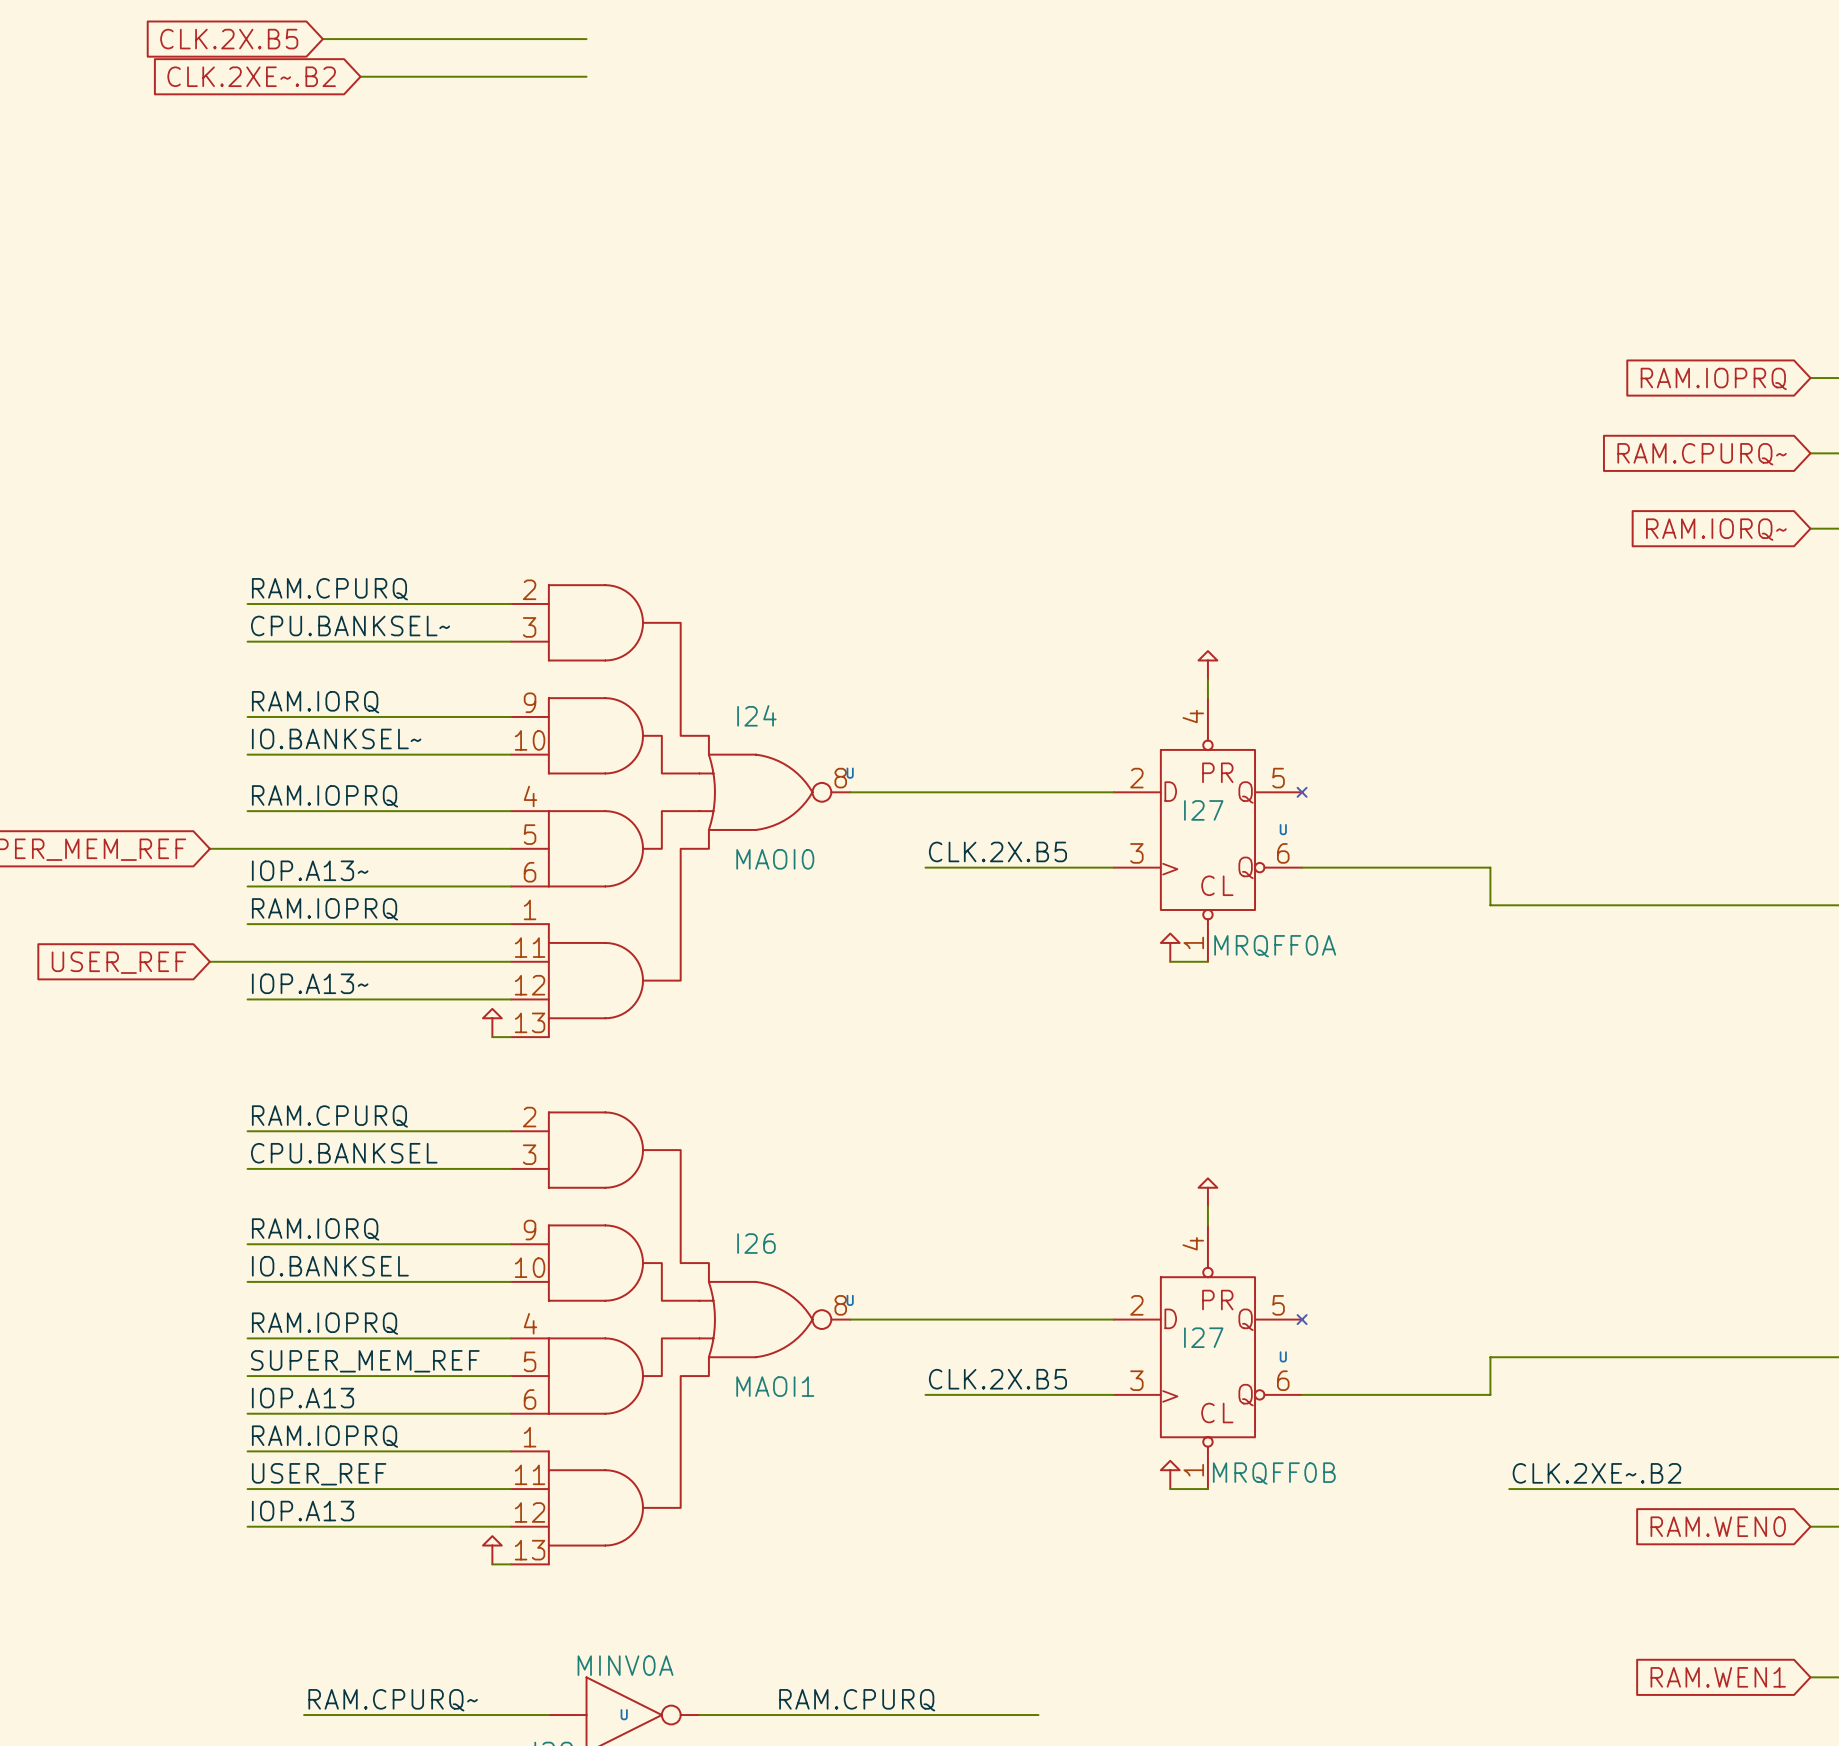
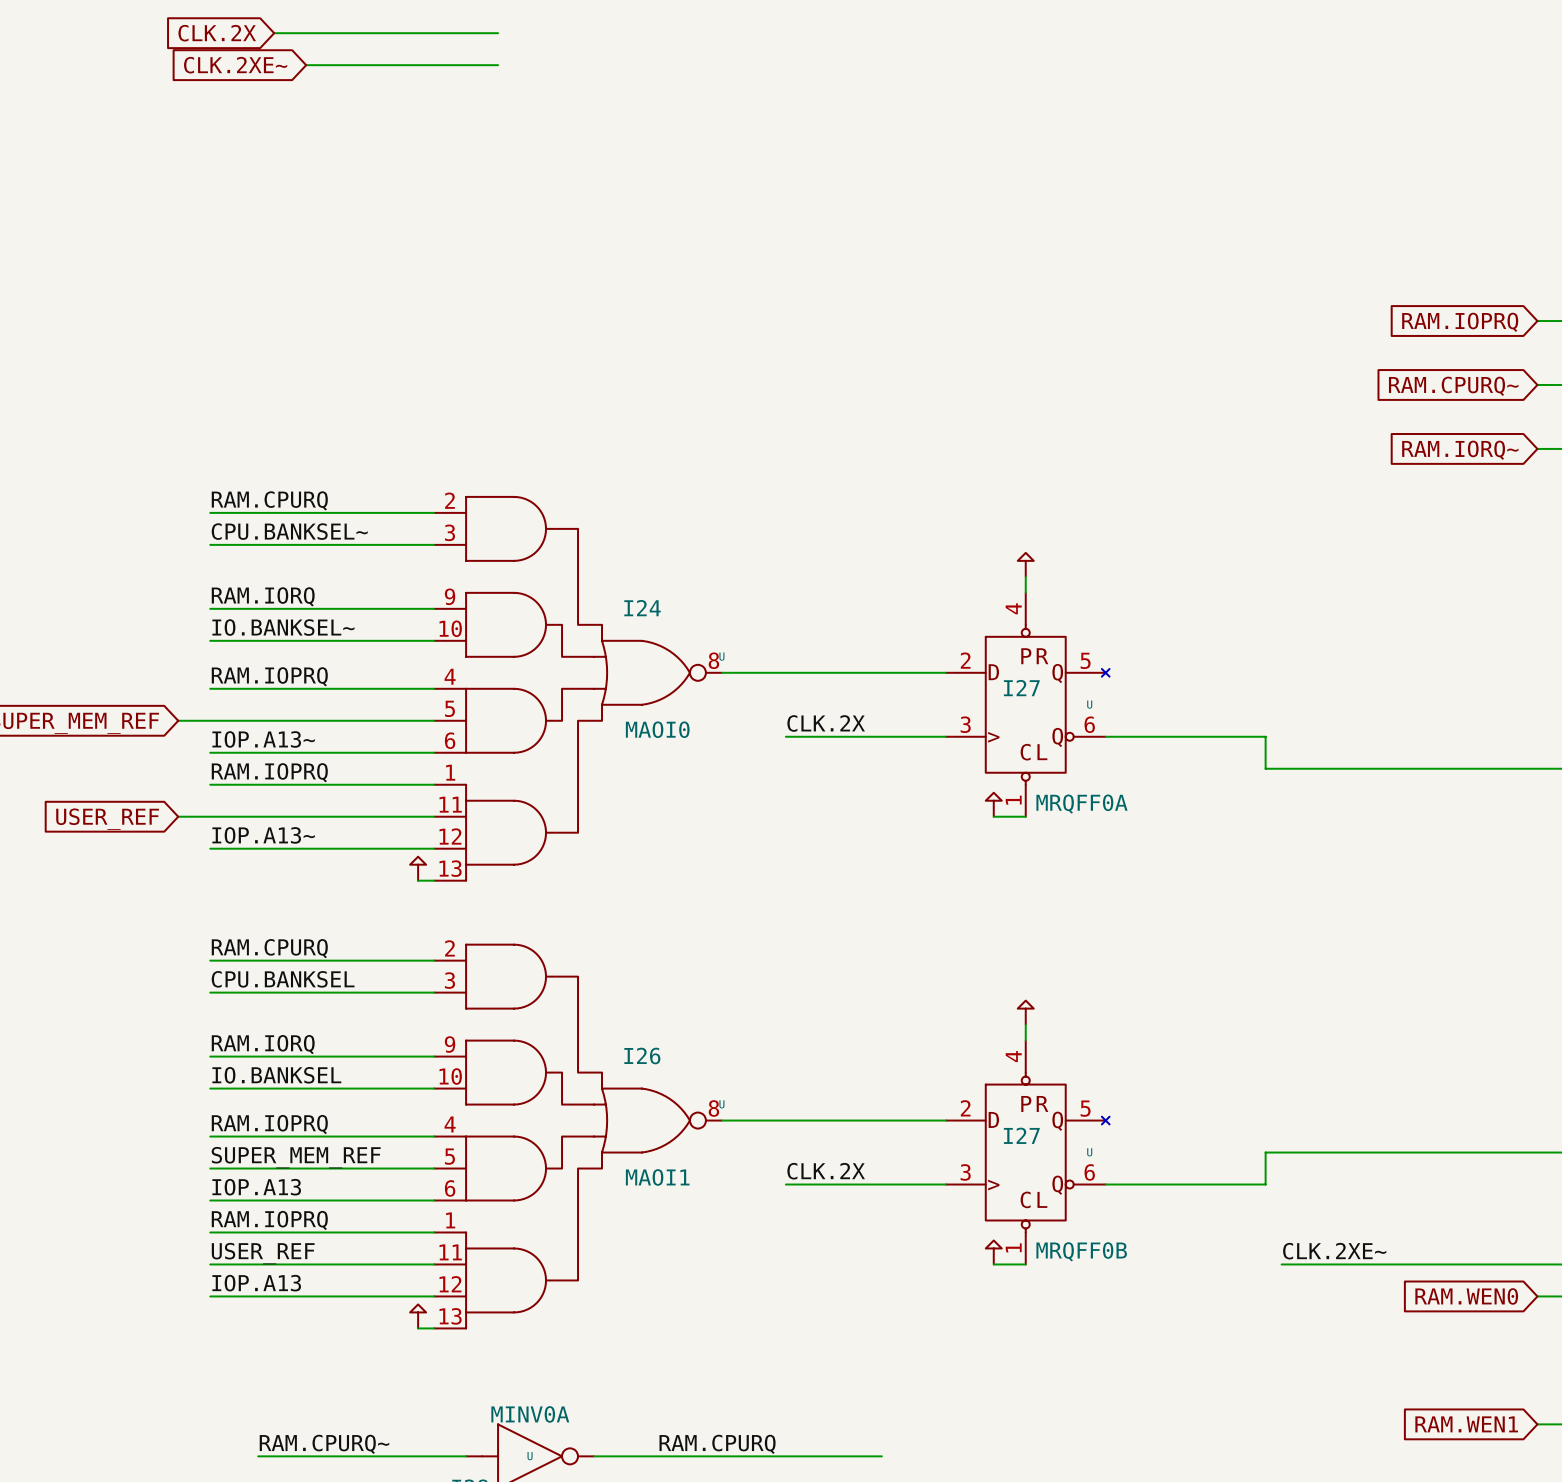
global label: CLK.2X.B5 (229, 39) -> CLK.2X (217, 33)
global label: CLK.2XE~.B2 (251, 76) -> CLK.2XE~ (235, 65)
label: CLK.2X.B5 (997, 851) -> CLK.2X (826, 723)
label: CLK.2X.B5 (997, 1379) -> CLK.2X (826, 1171)
label: CLK.2XE~.B2 (1596, 1473) -> CLK.2XE~ (1334, 1251)

